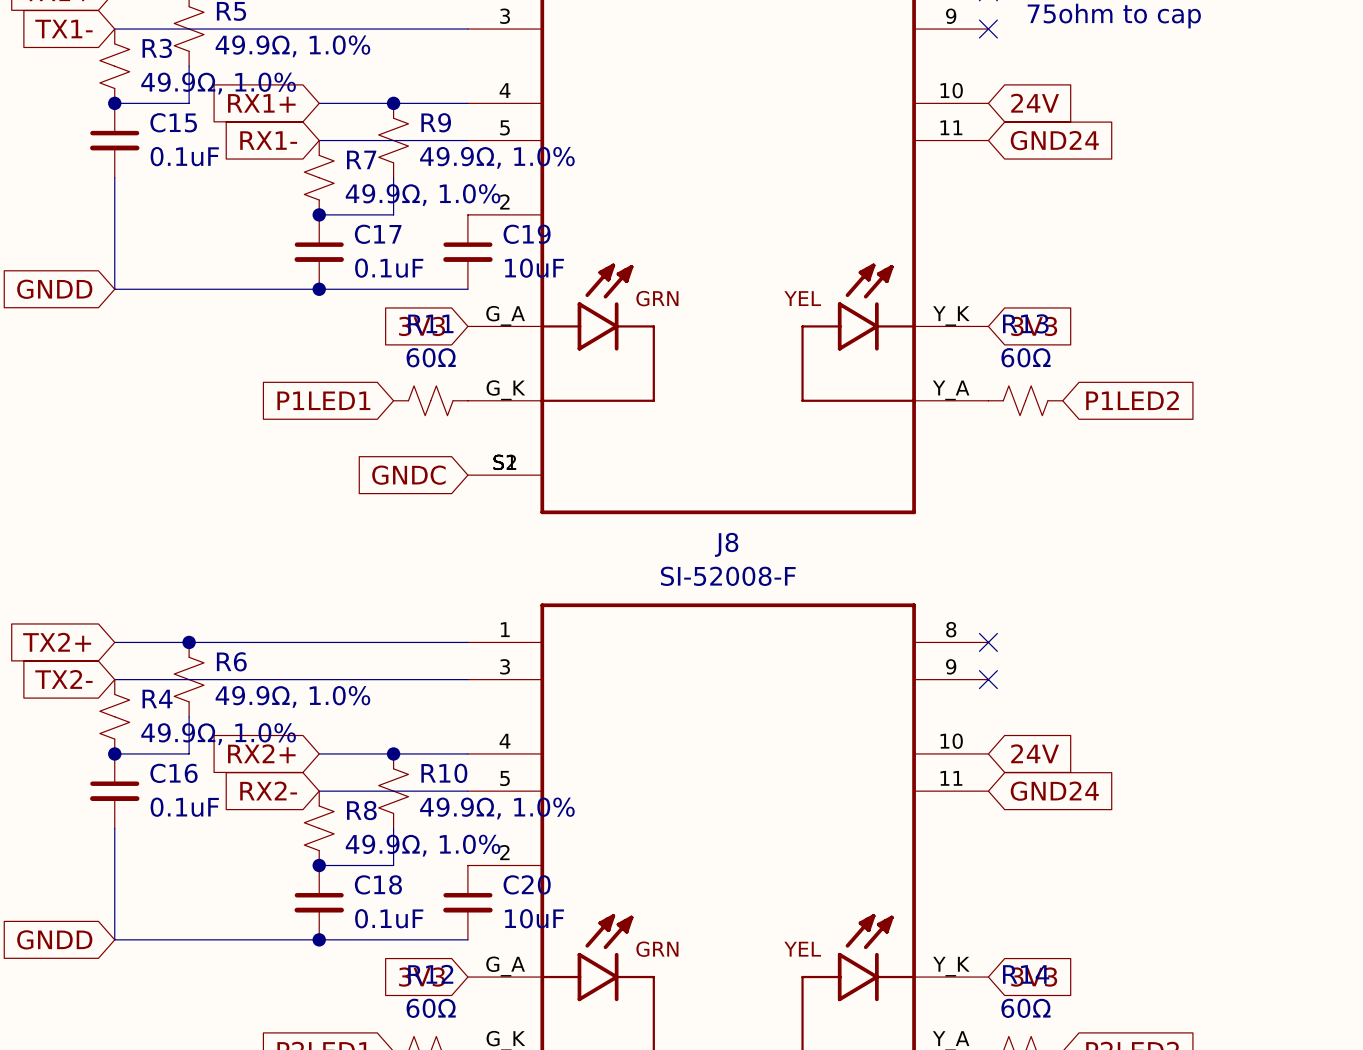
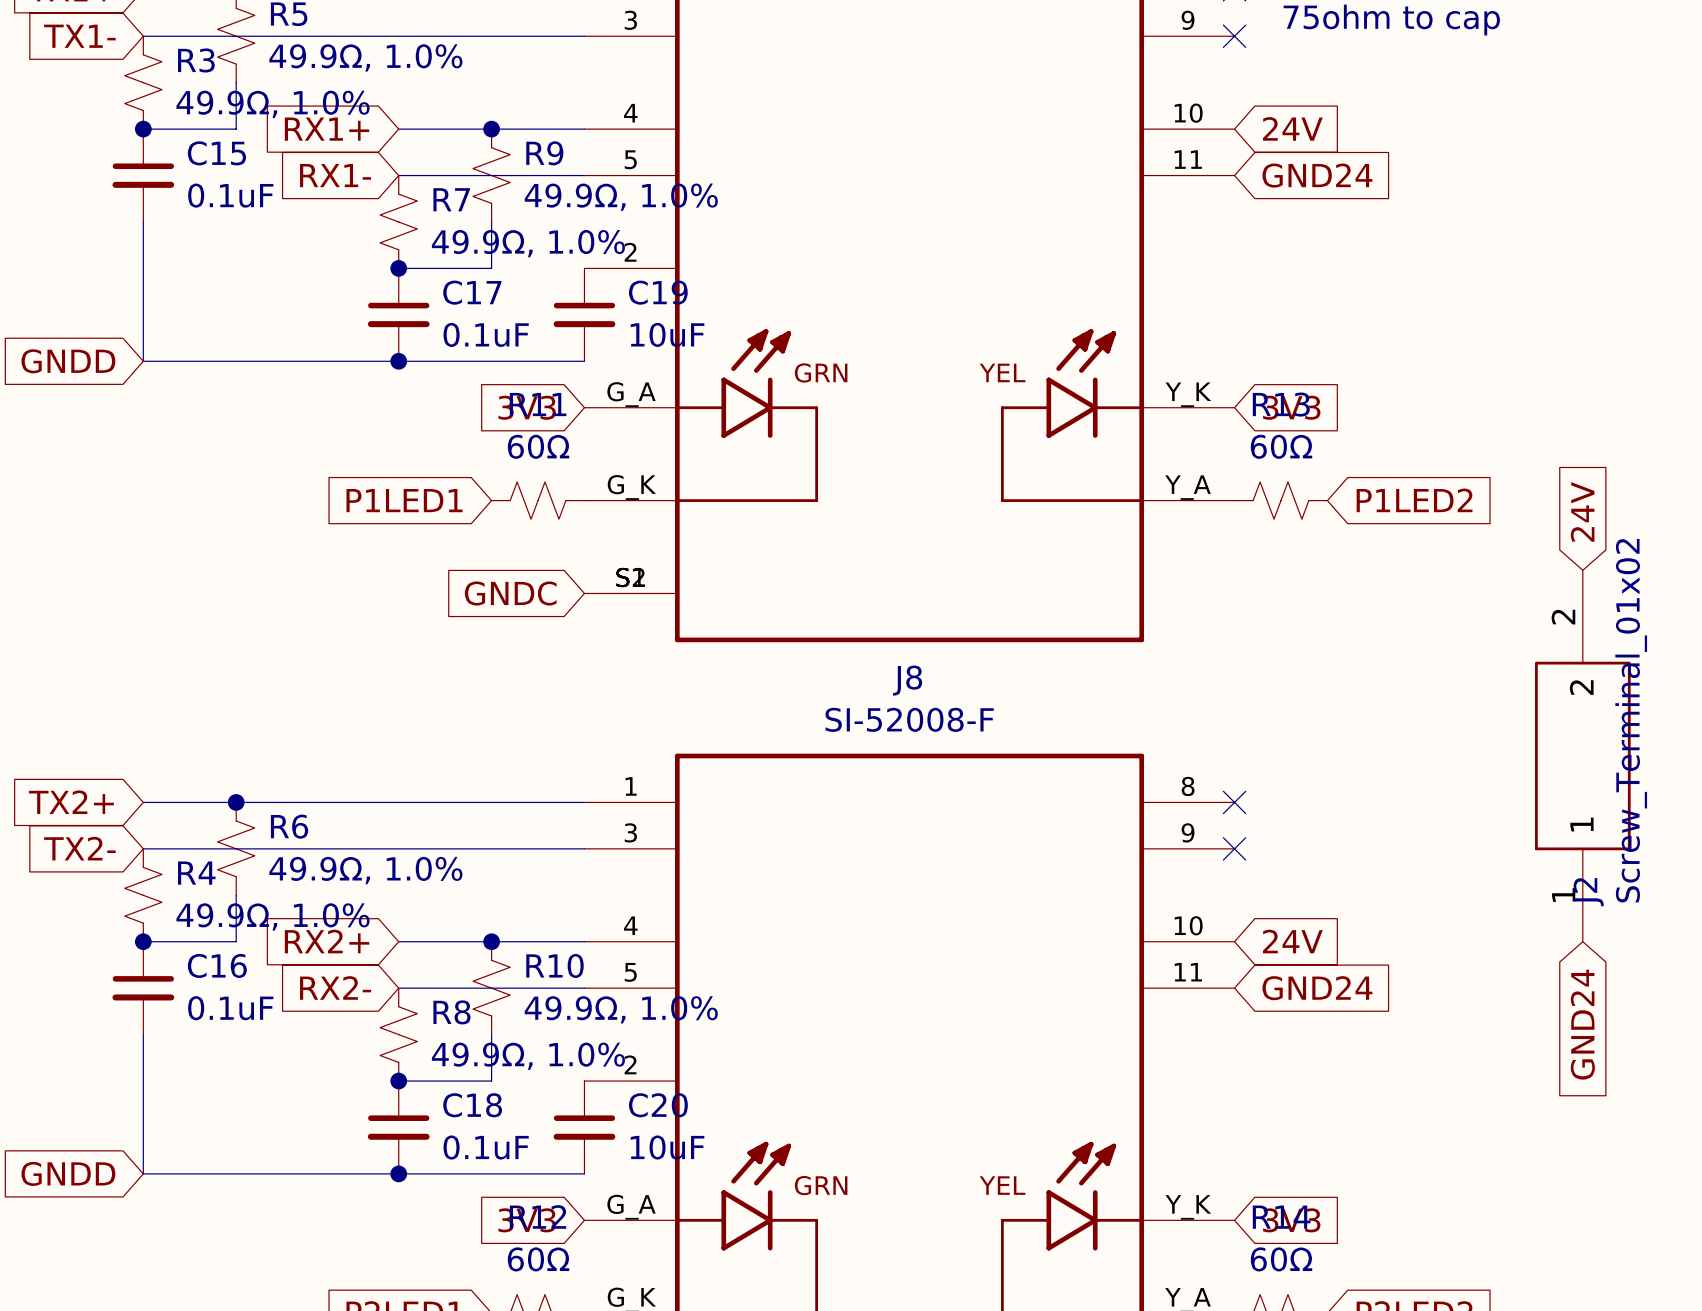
global label: none -> 24V (1582, 511)
J2: none -> Screw_Terminal_01x02 (1582, 755)
global label: none -> GND24 (1582, 1024)

